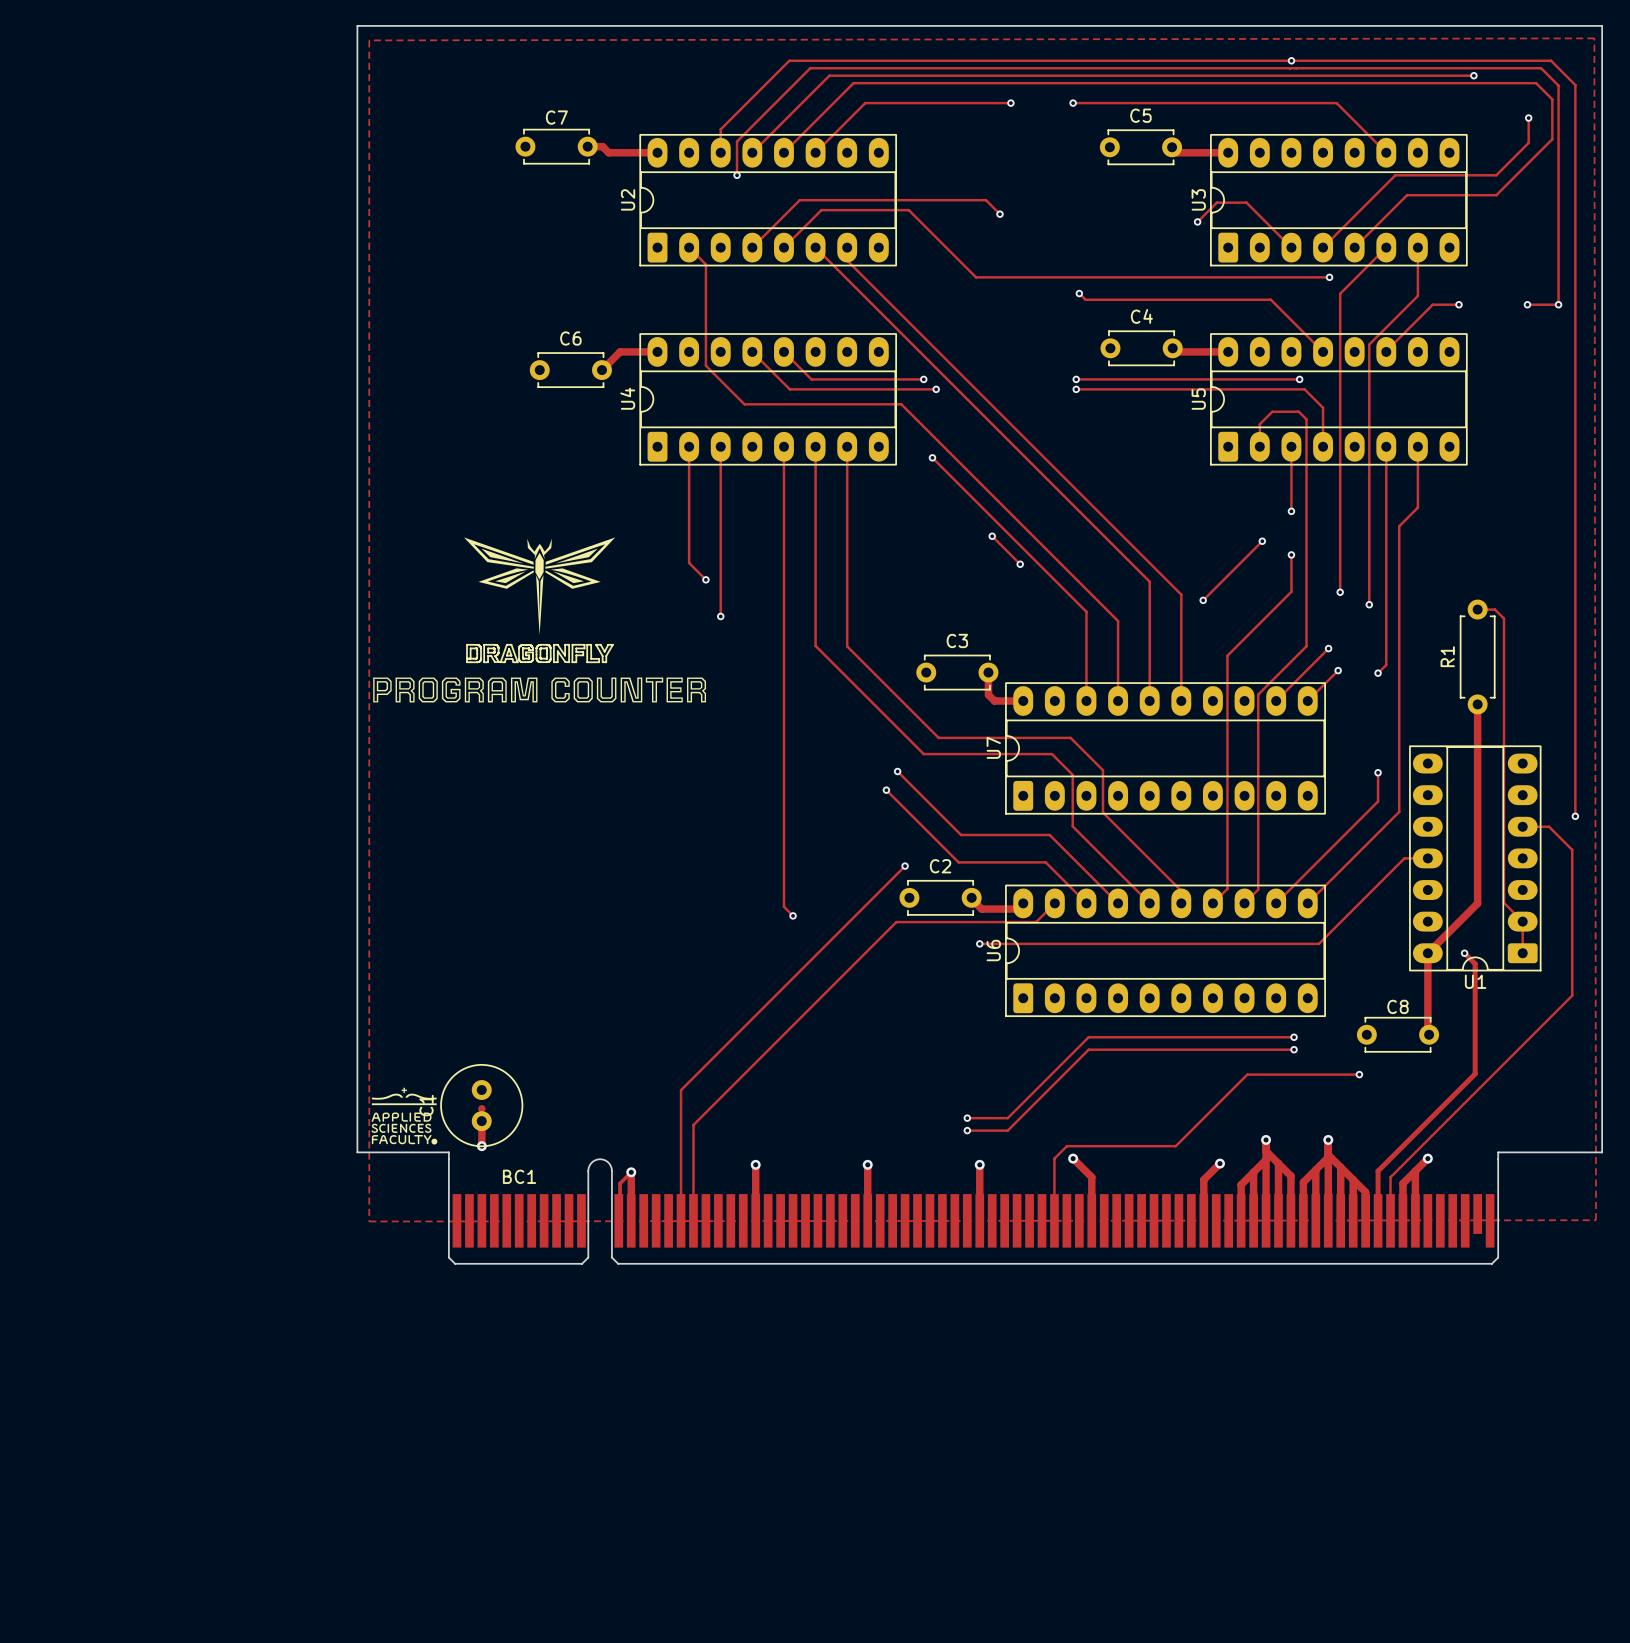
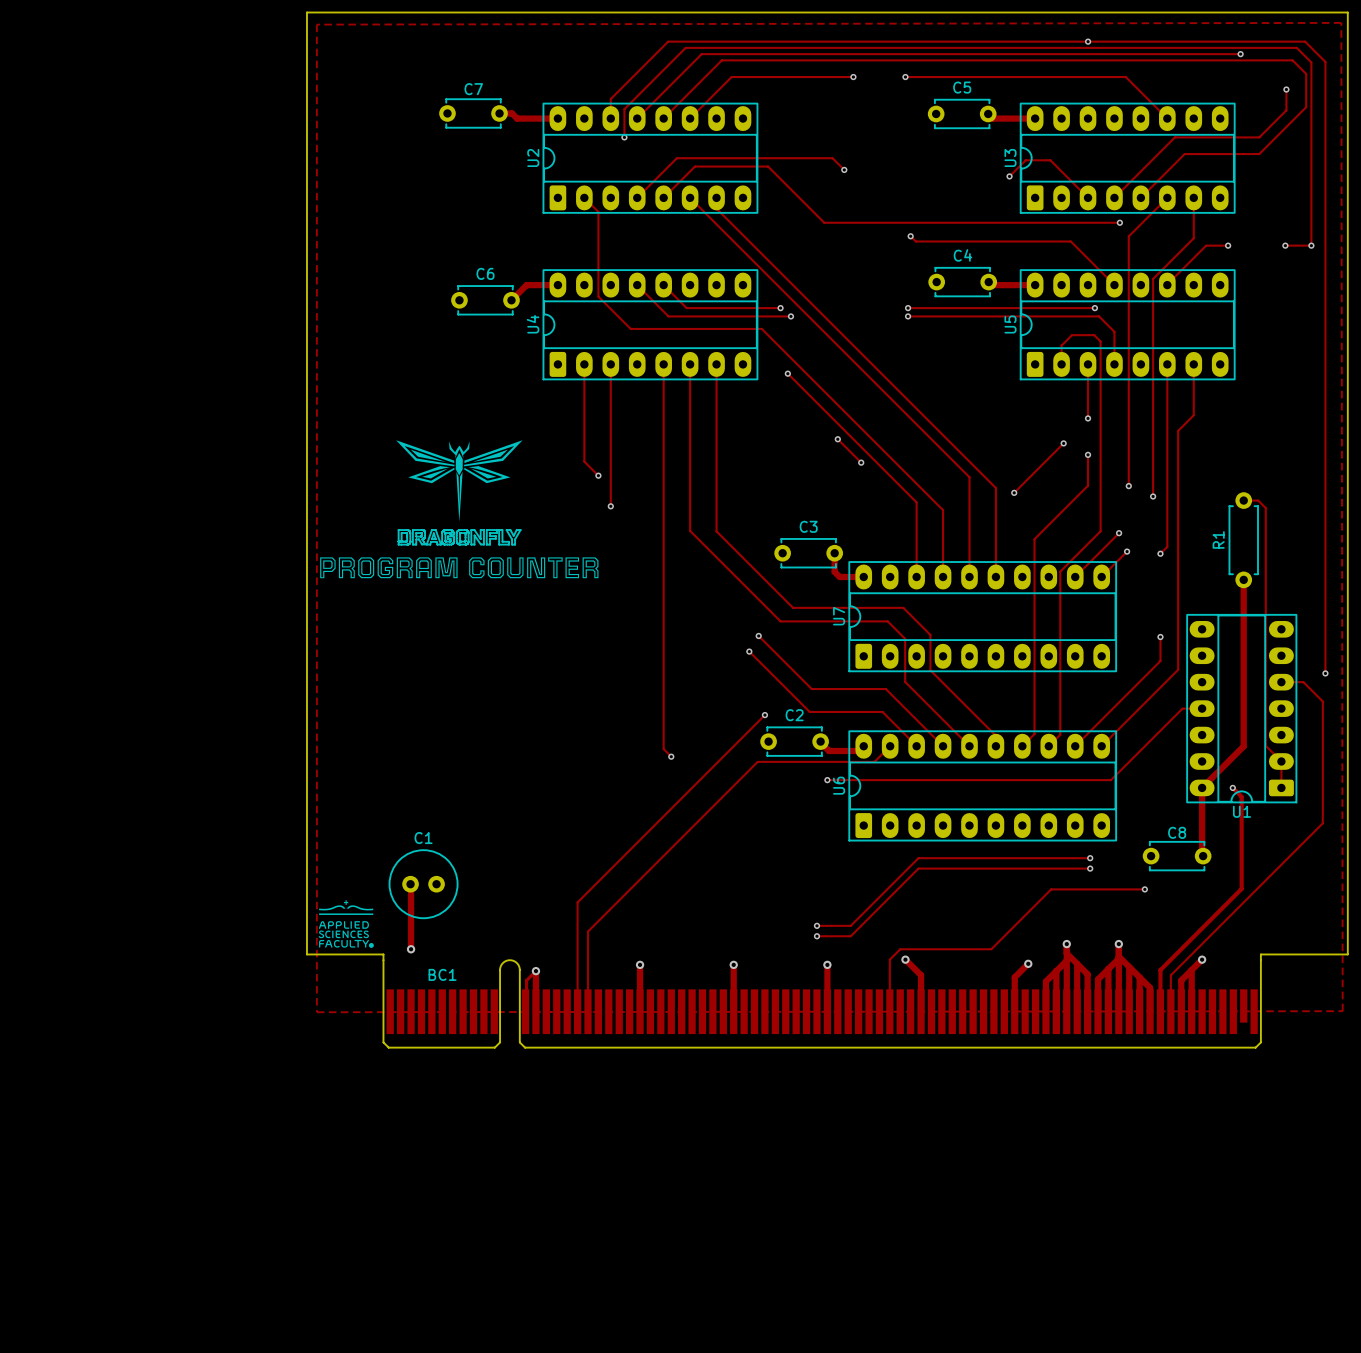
track: none -> (411, 884) (411, 928)
C1 rotation: 0° (481, 1105) -> 90° clockwise (423, 884)

